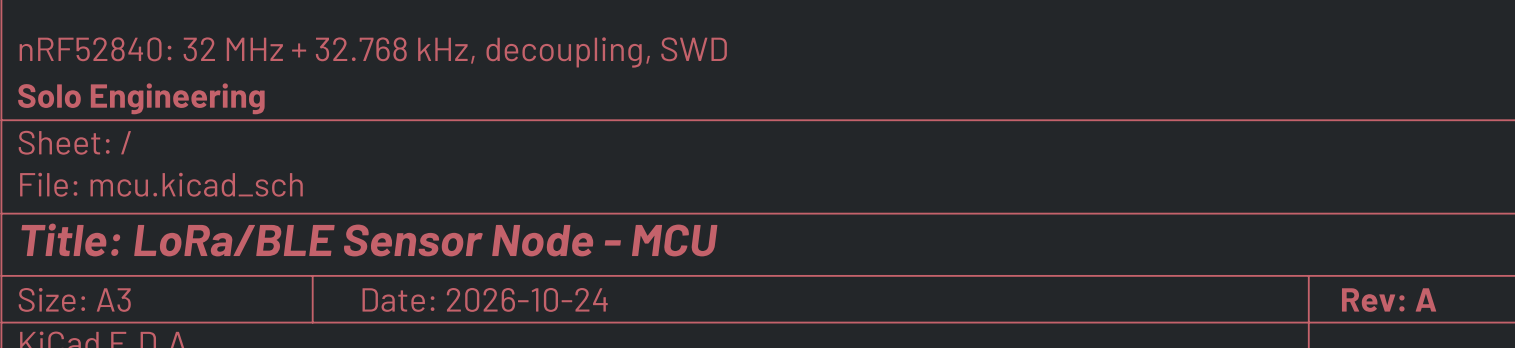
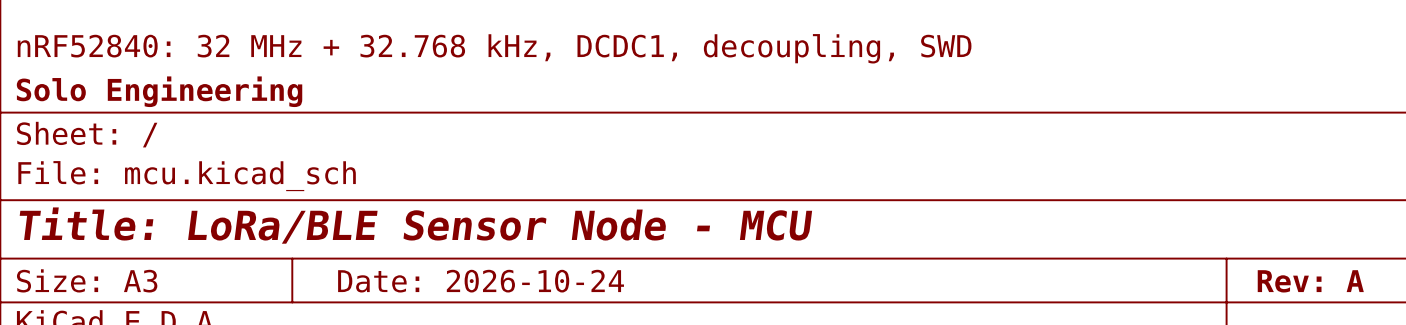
title block: nRF52840: 32 MHz + 32.768 kHz, decoupling, SWD (373, 52) -> nRF52840: 32 MHz + 32.768 kHz, DCDC1, decoupling, SWD (494, 48)

